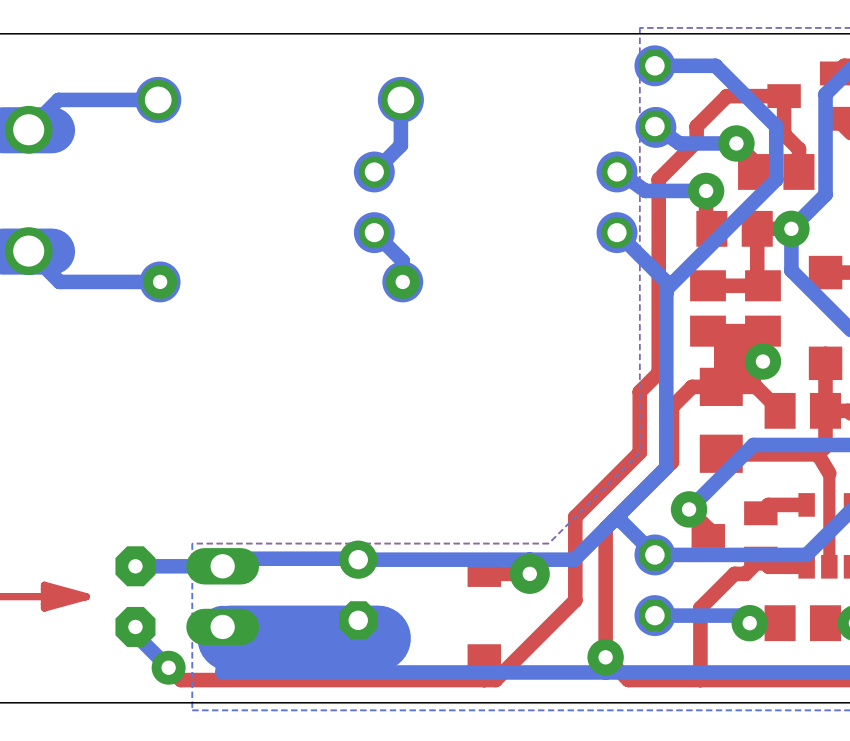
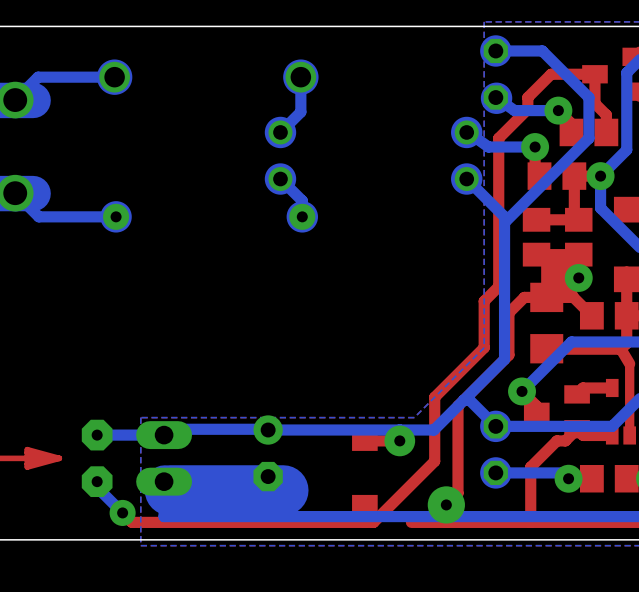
via size: [587, 639, 624, 676] -> [427, 486, 465, 524]
top track: none -> (475, 522) (411, 522)

